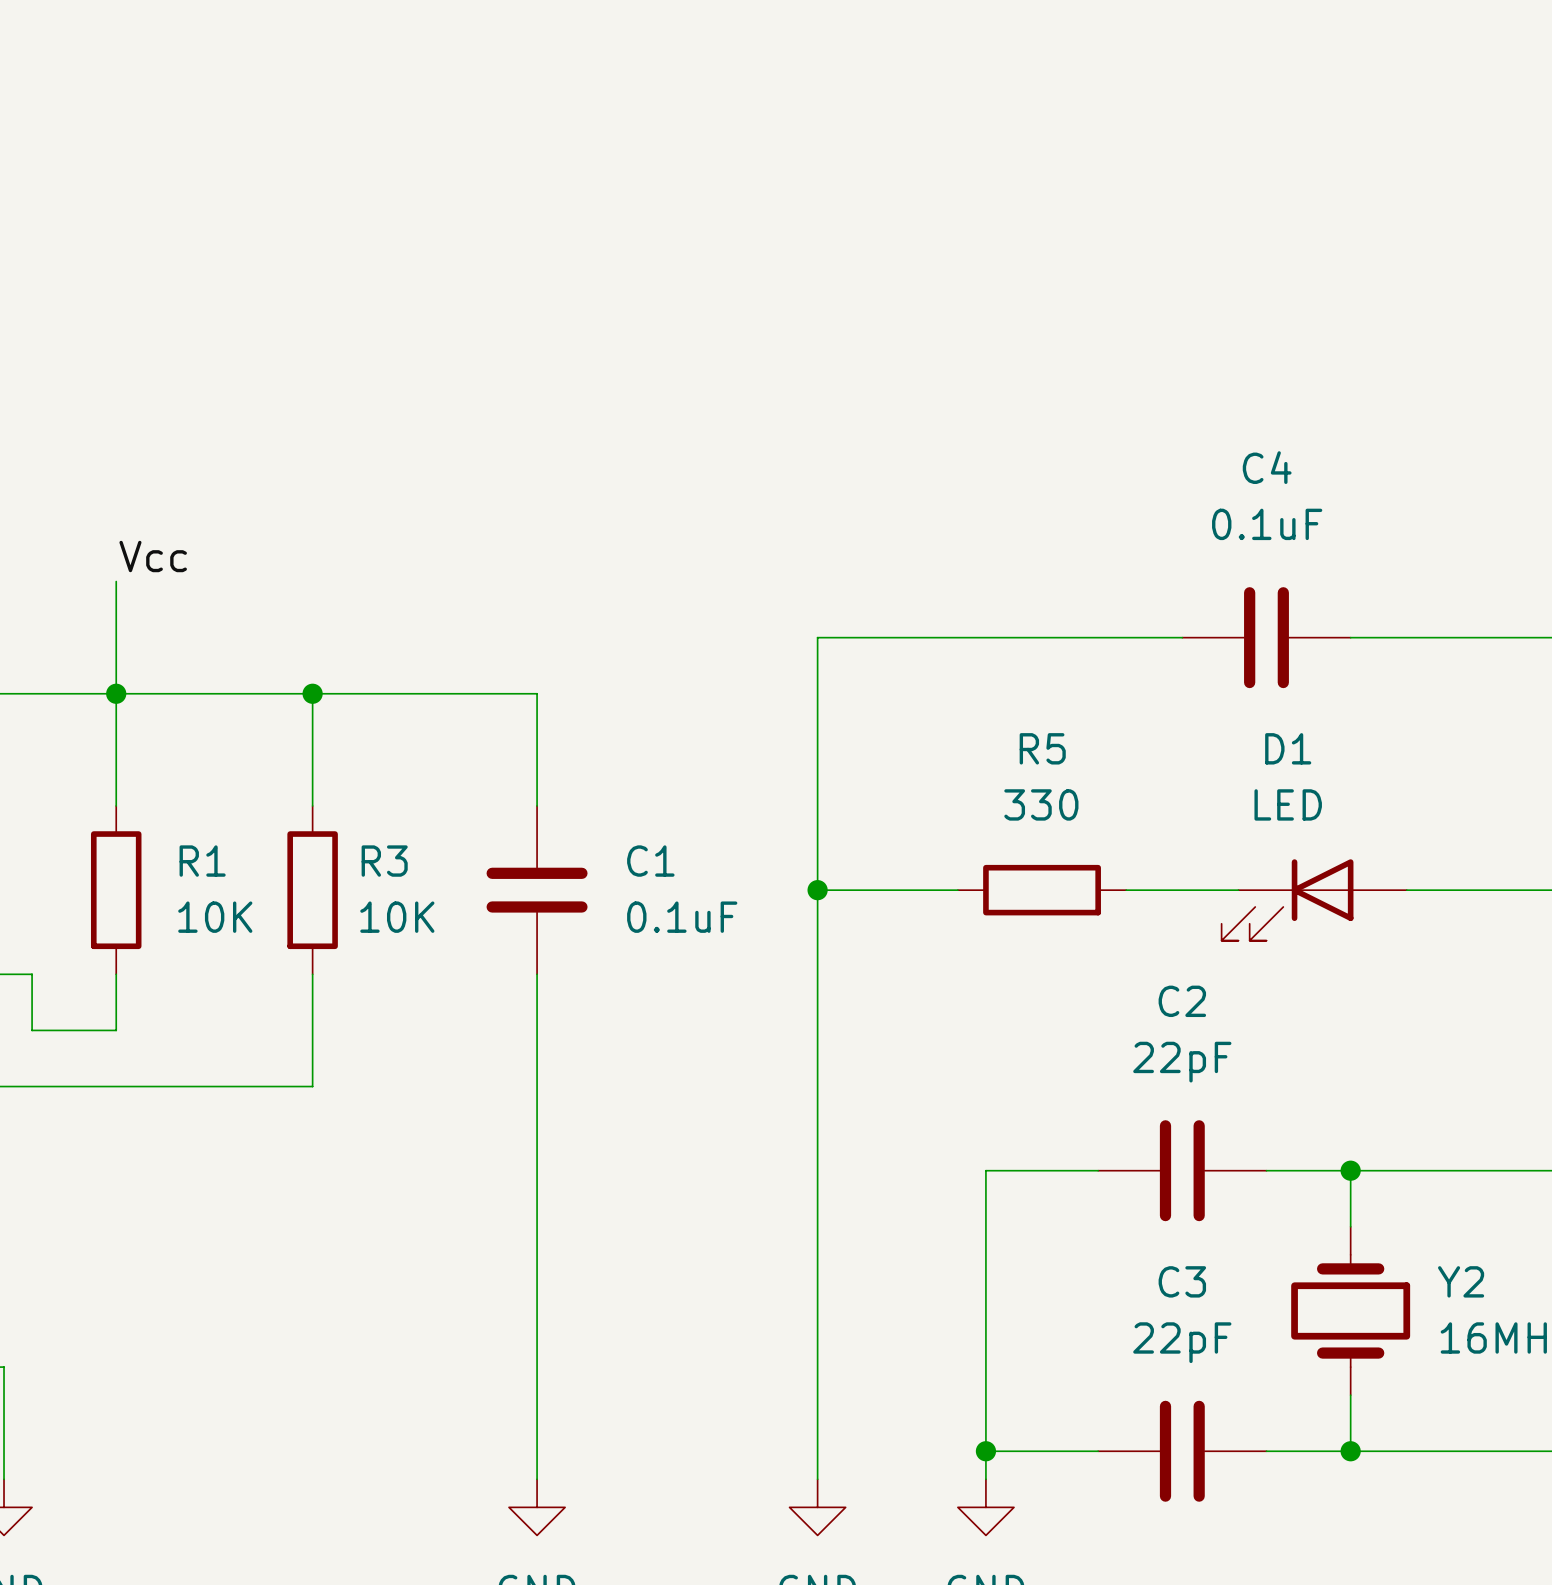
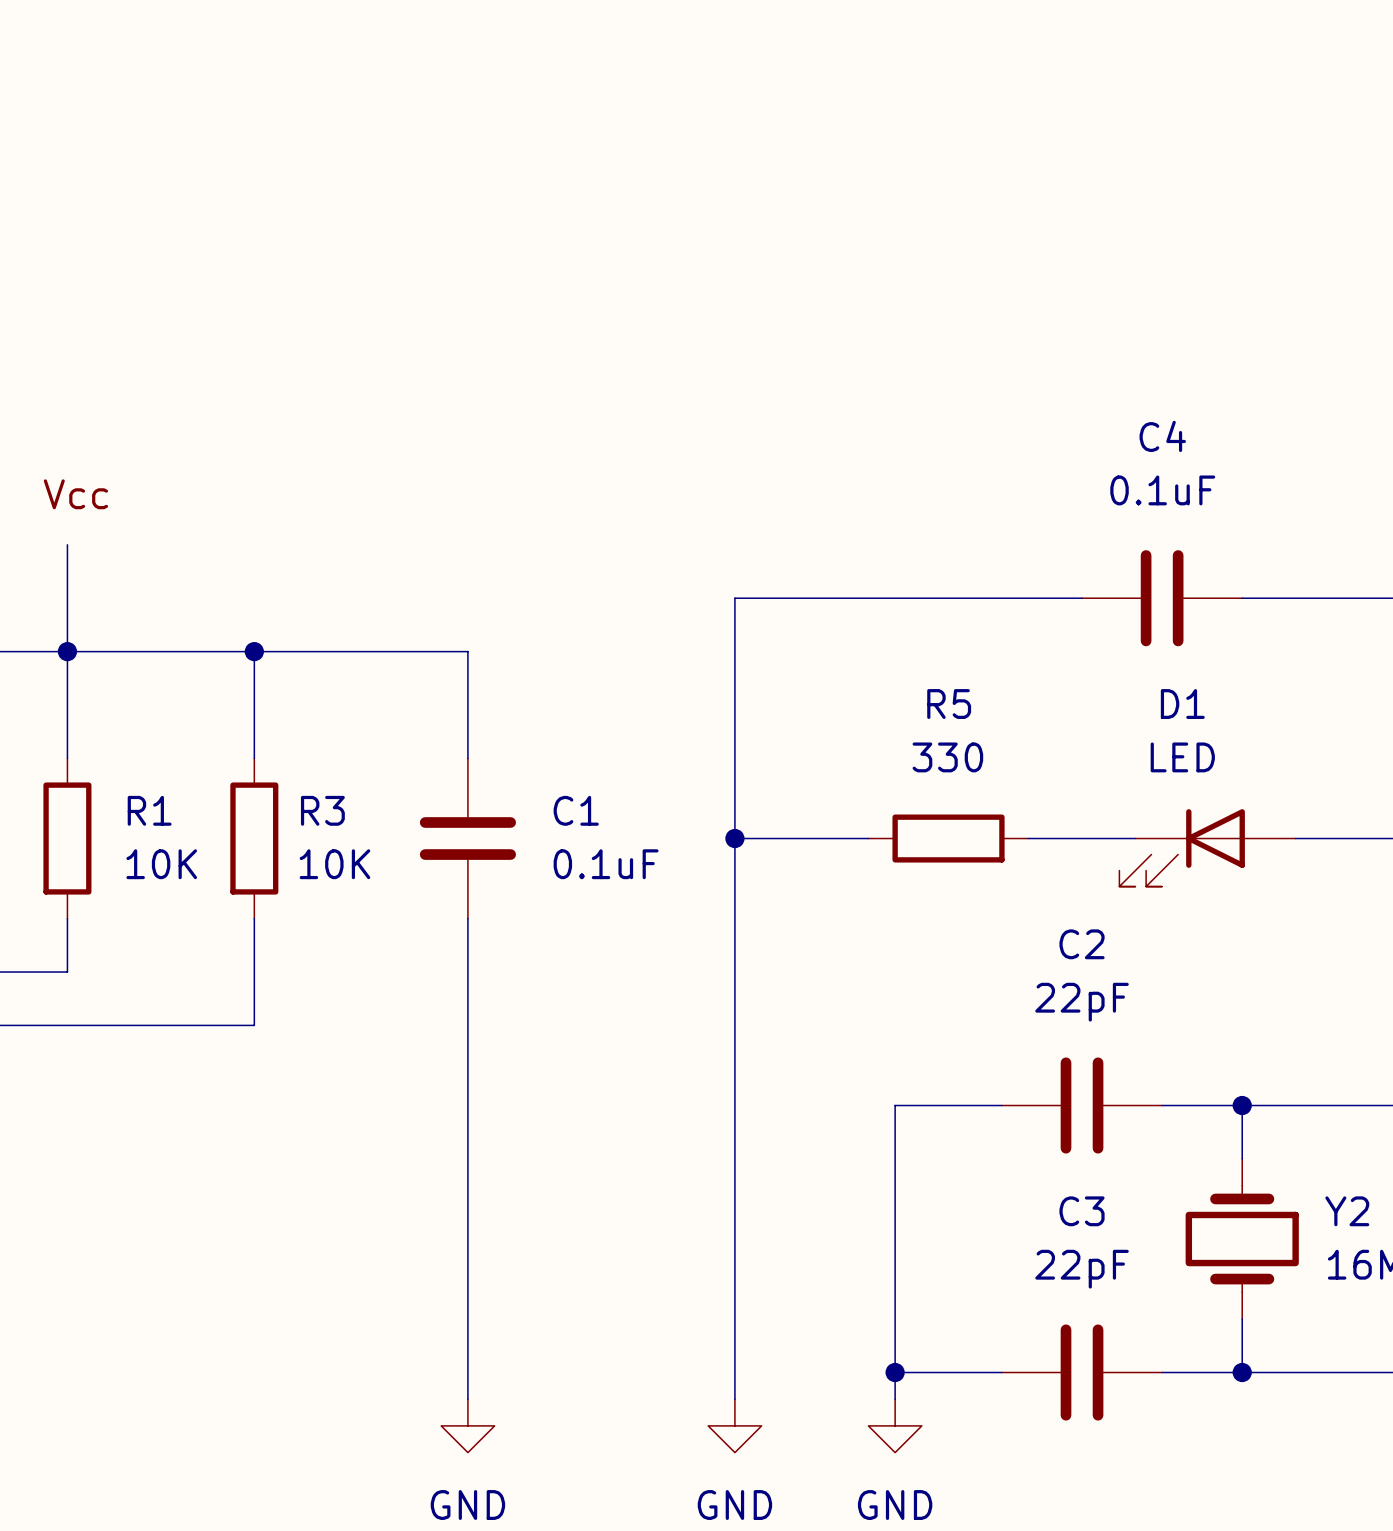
label position: Vcc (153, 556) -> Vcc (75, 494)

